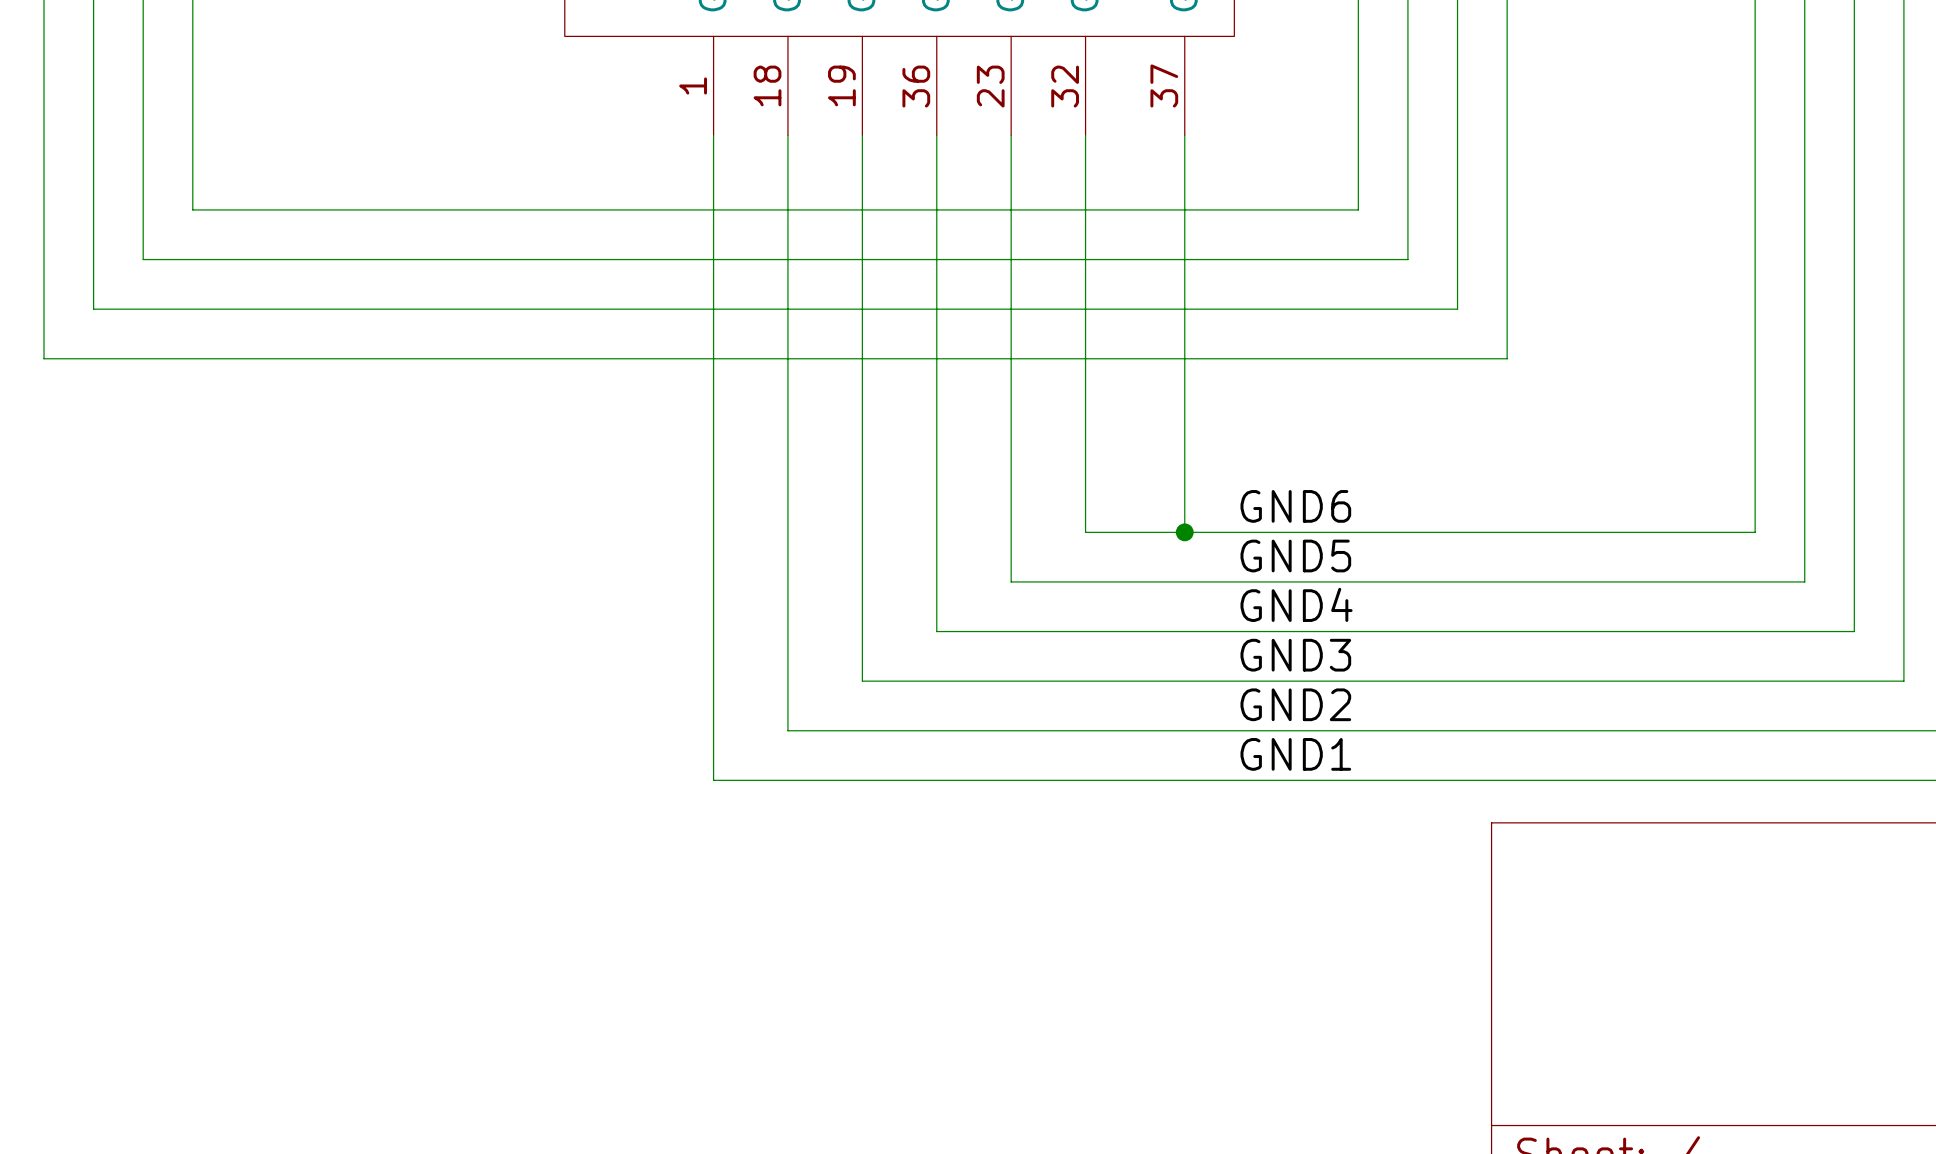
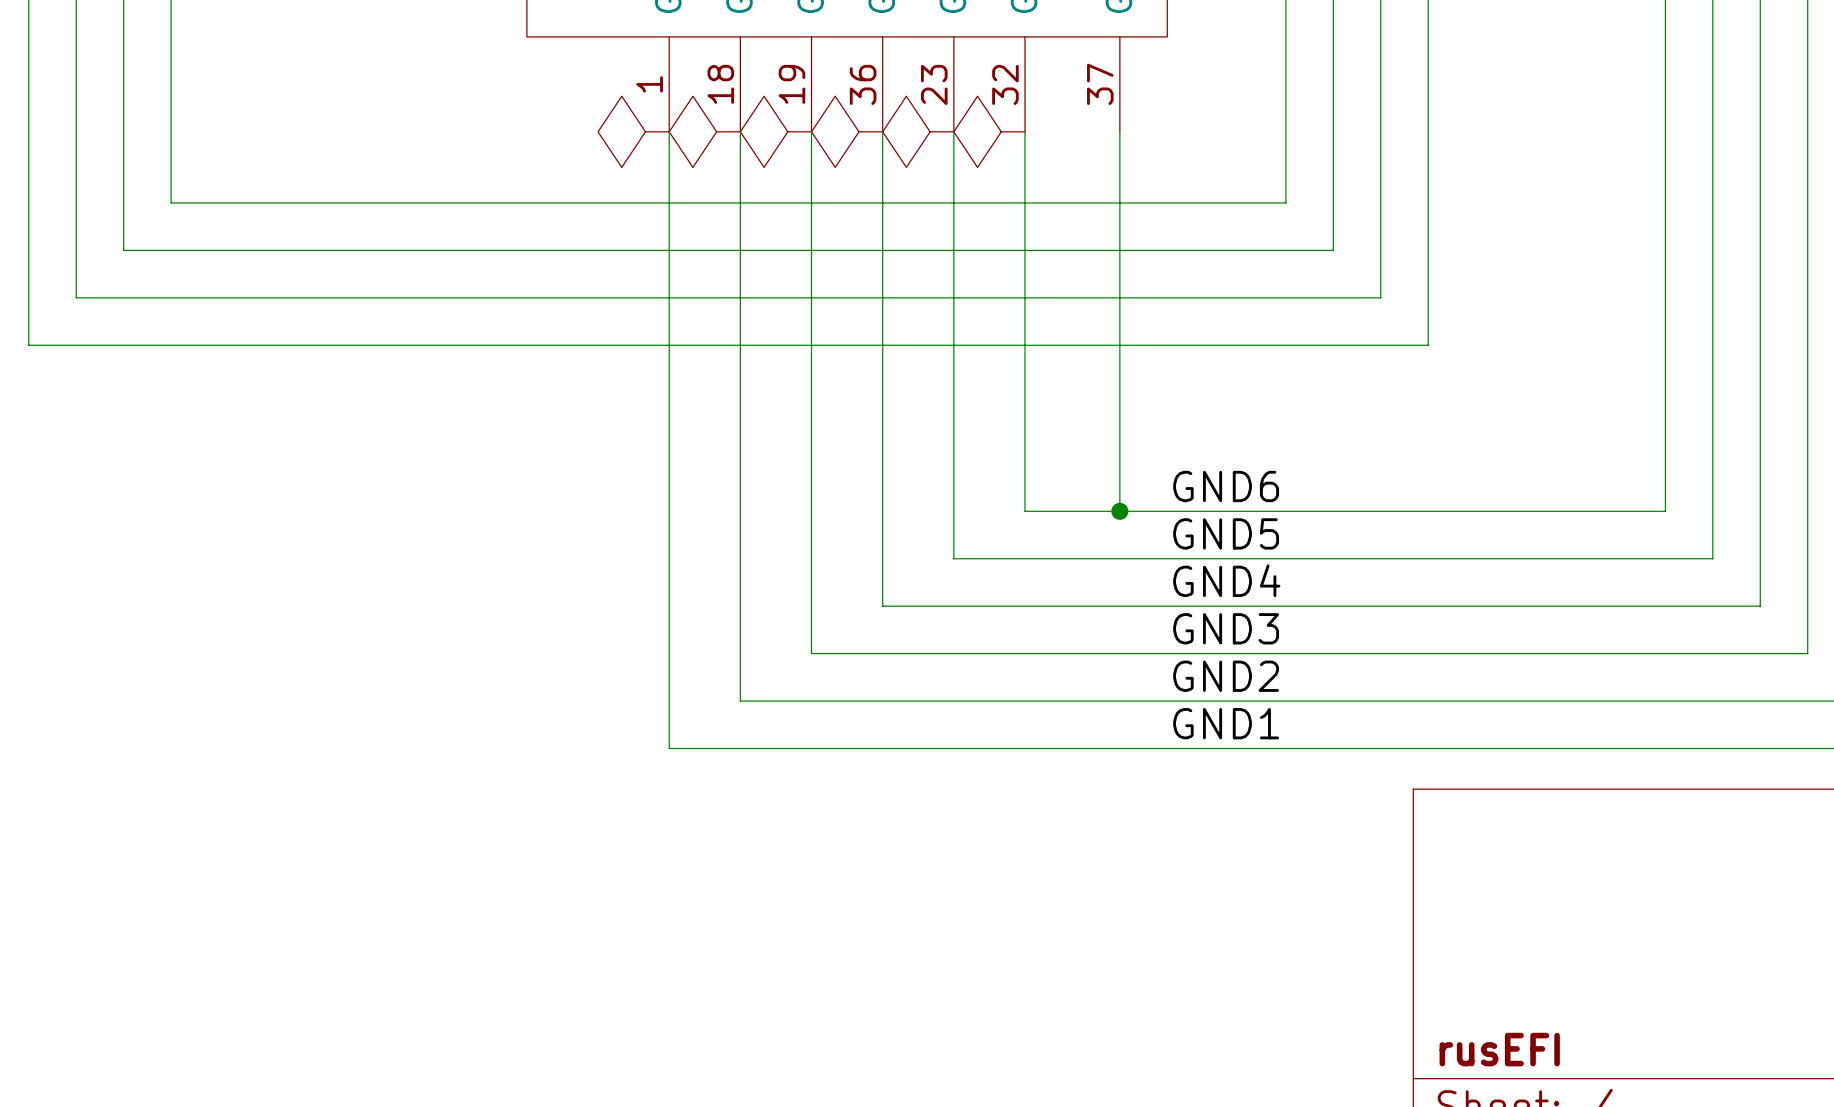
power symbol: none -> (633, 131)
power symbol: none -> (704, 131)
power symbol: none -> (775, 131)
power symbol: none -> (847, 131)
power symbol: none -> (918, 131)
power symbol: none -> (989, 131)
title block: none -> rusEFI (1499, 1049)

